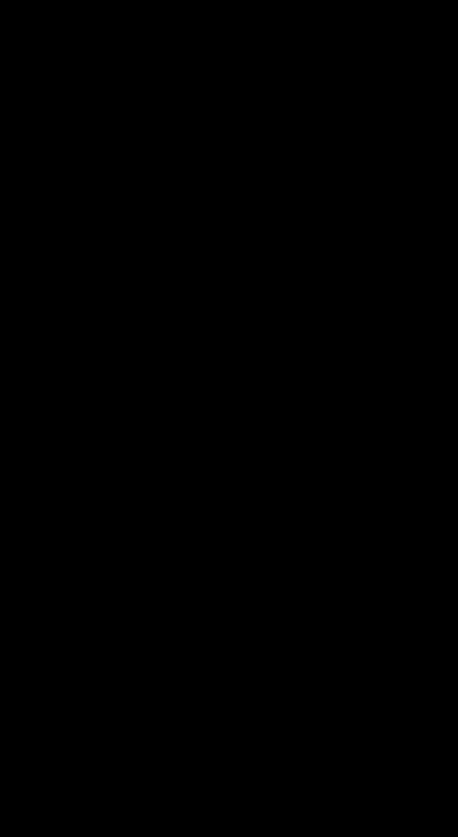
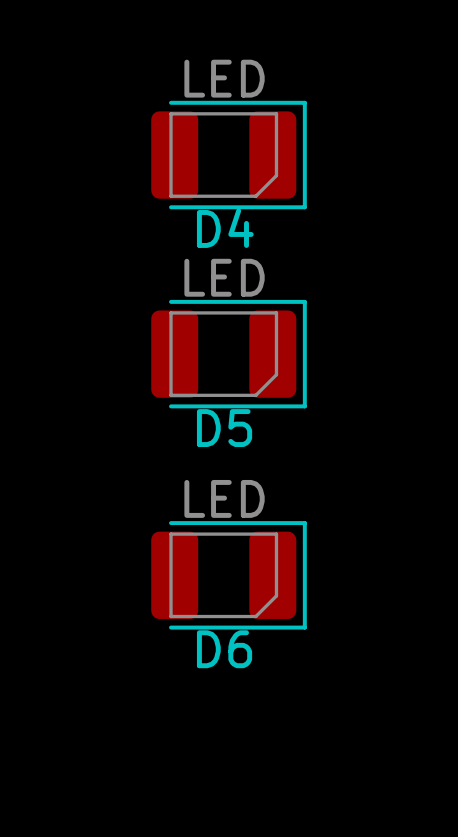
D4: none -> LED (229, 155)
D5: none -> LED (229, 354)
D6: none -> LED (229, 575)

